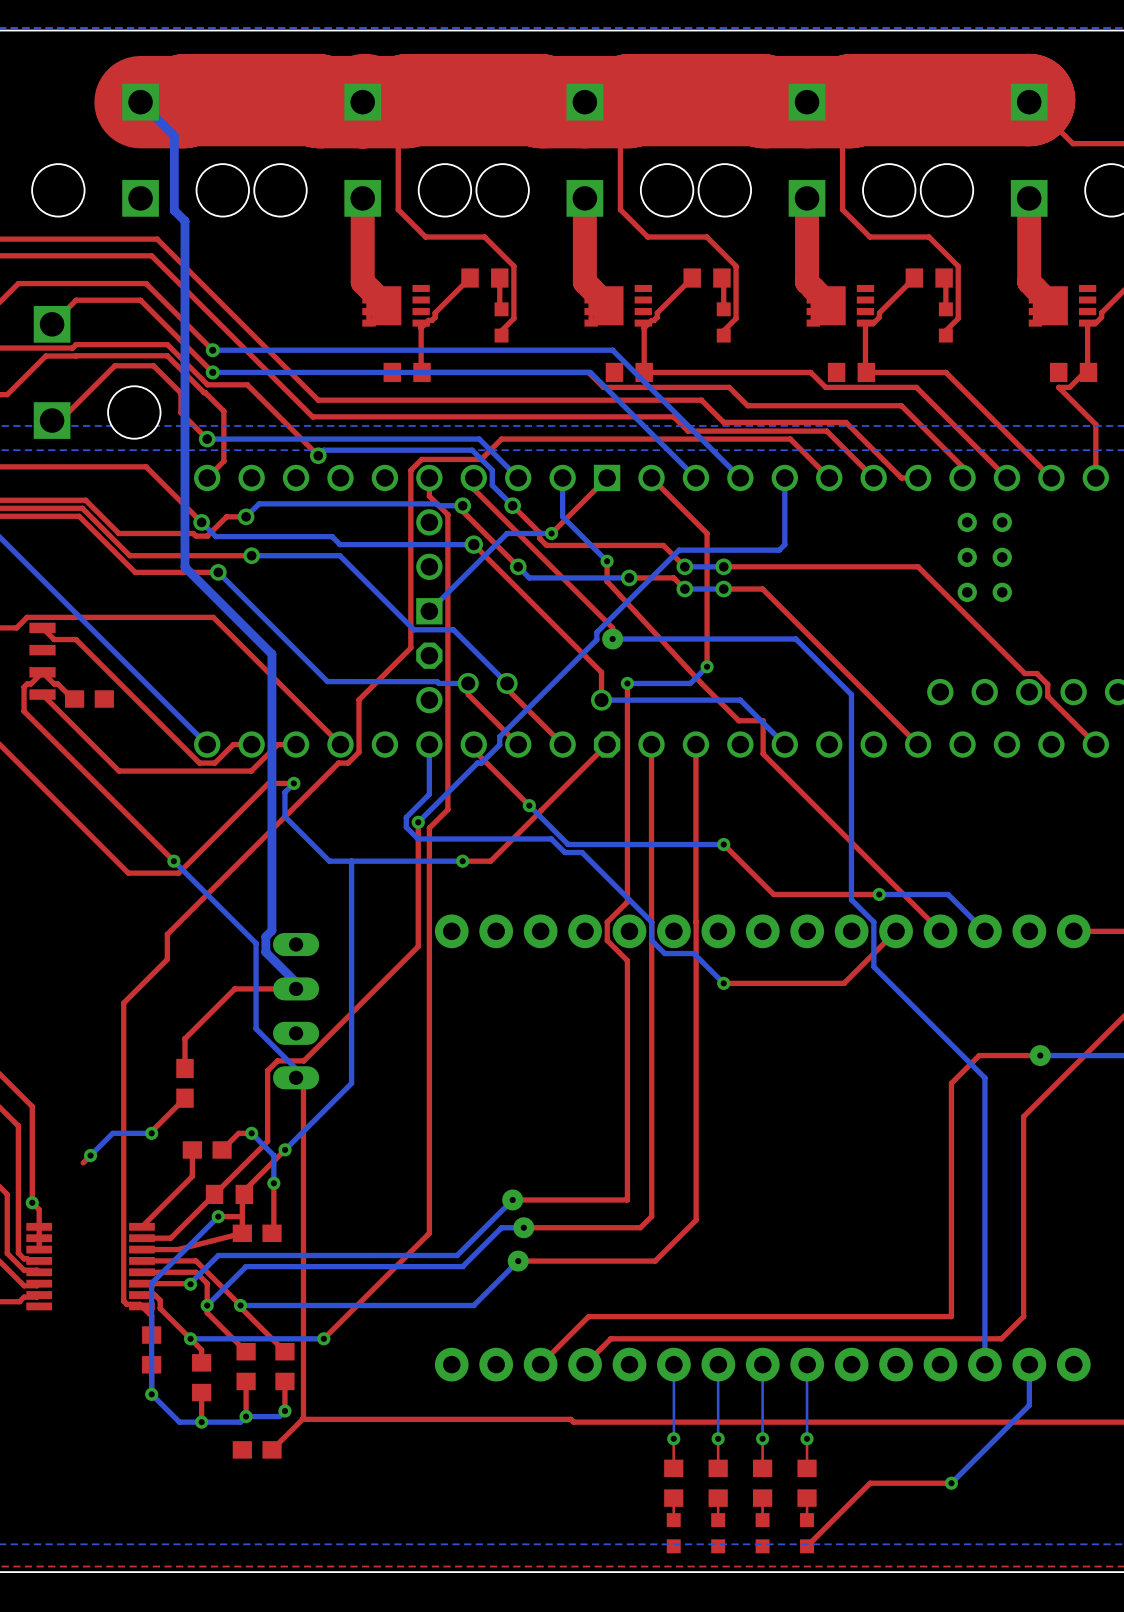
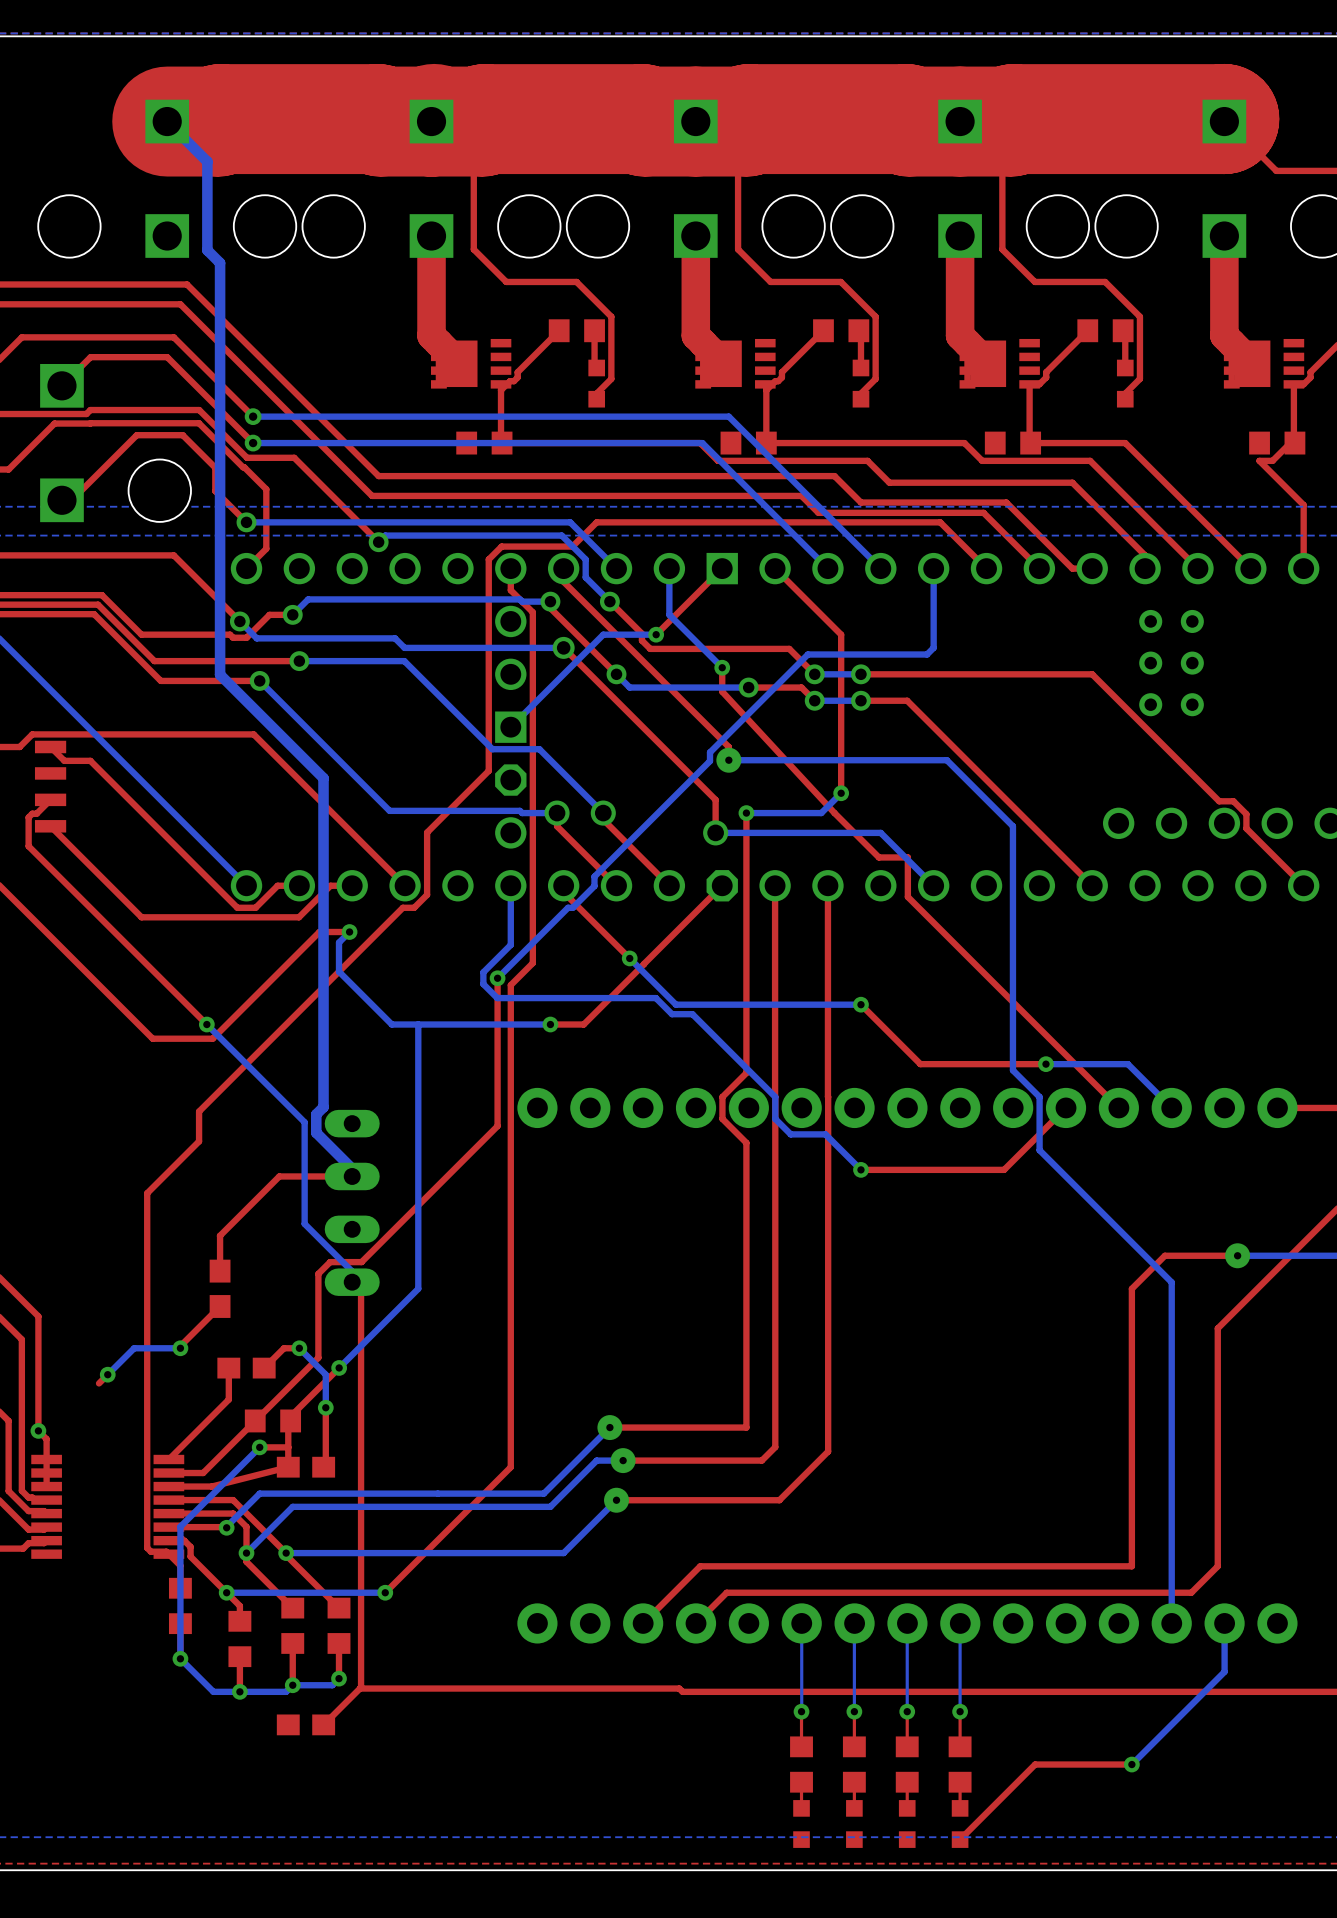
top track: (42, 672) (54, 683) (57, 683) (74, 699) -> none
part: (89, 699) -> none

